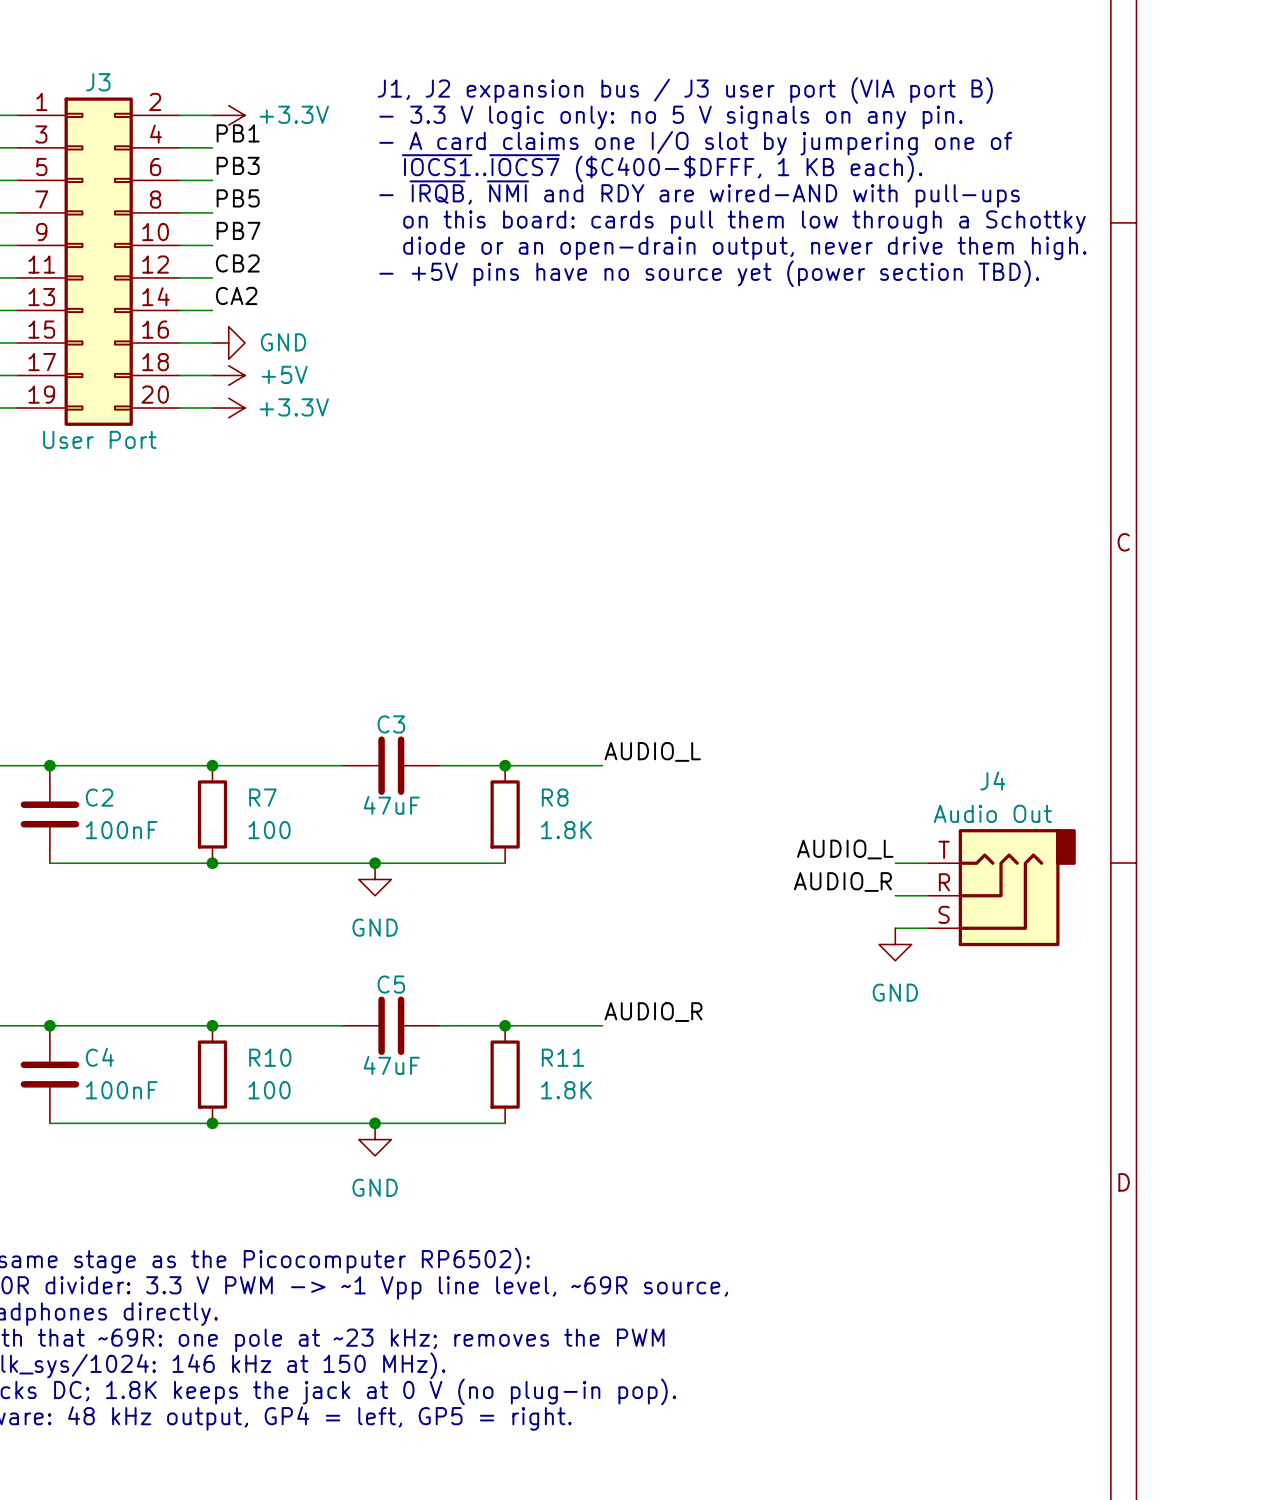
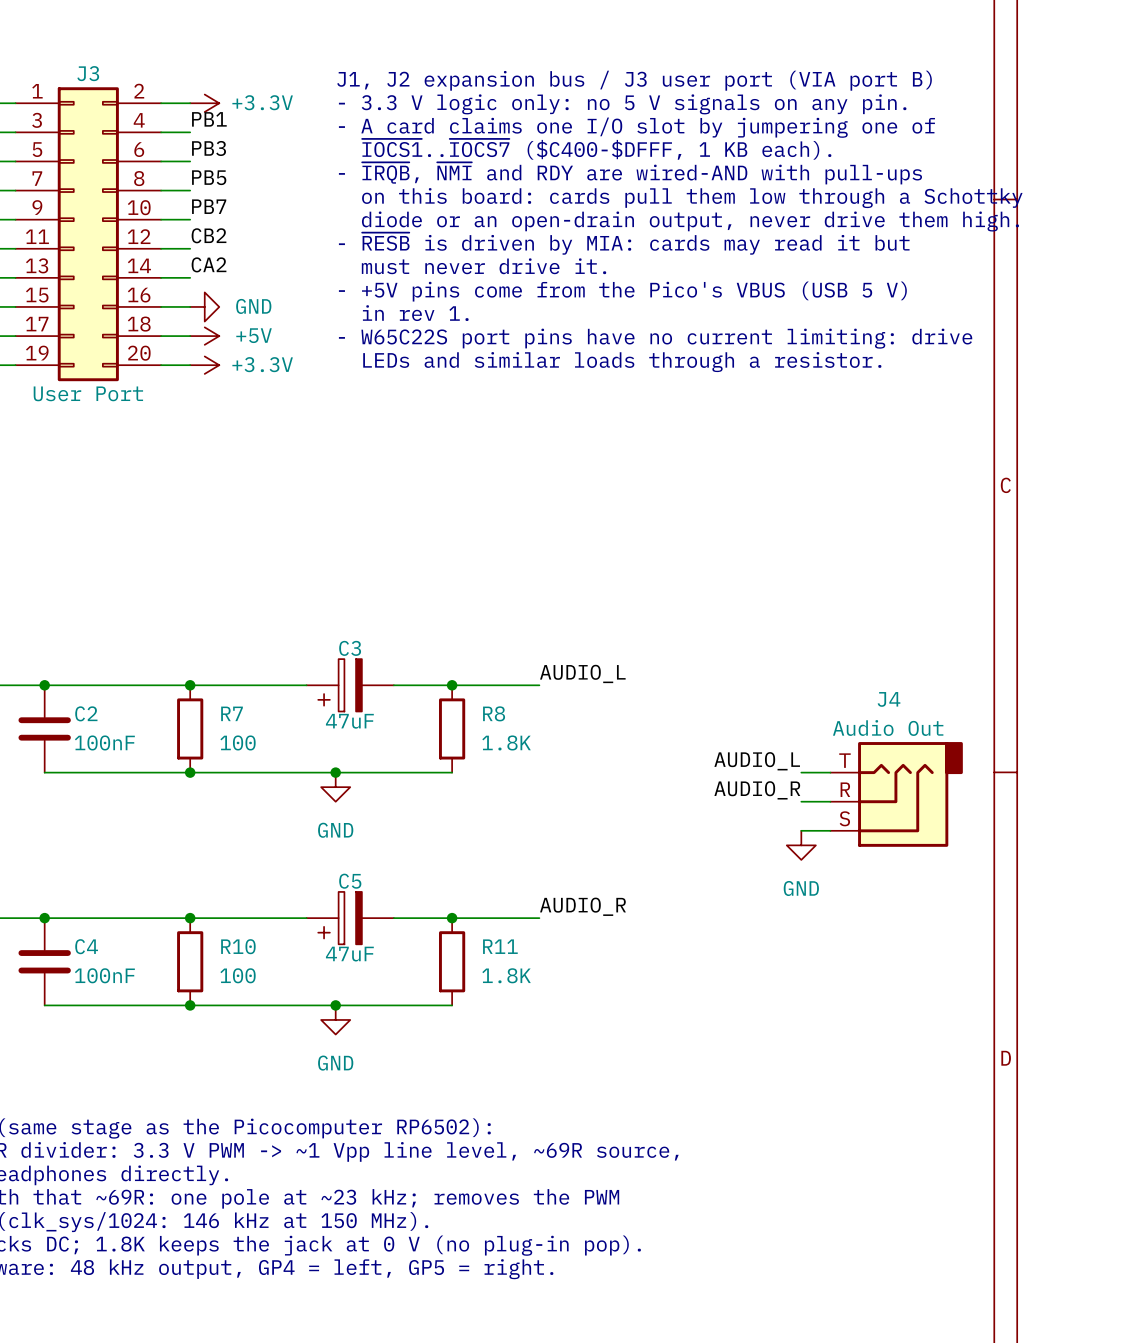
text: - +5V pins have no source yet (power section TBD). (709, 273) -> - ~{RESB} is driven by MIA: cards may read it but (624, 243)
text: none -> must never drive it. (484, 266)
text: none -> - +5V pins come from the Pico's VBUS (USB 5 V) (622, 291)
text: none -> in rev 1. (415, 313)
text: none -> - W65C22S port pins have no current limiting: drive (655, 338)
text: none -> LEDs and similar loads through a resistor. (622, 362)
C3 symbol: [342, 736, 441, 795] -> [306, 659, 394, 712]
C5 symbol: [342, 996, 441, 1056] -> [306, 891, 394, 945]

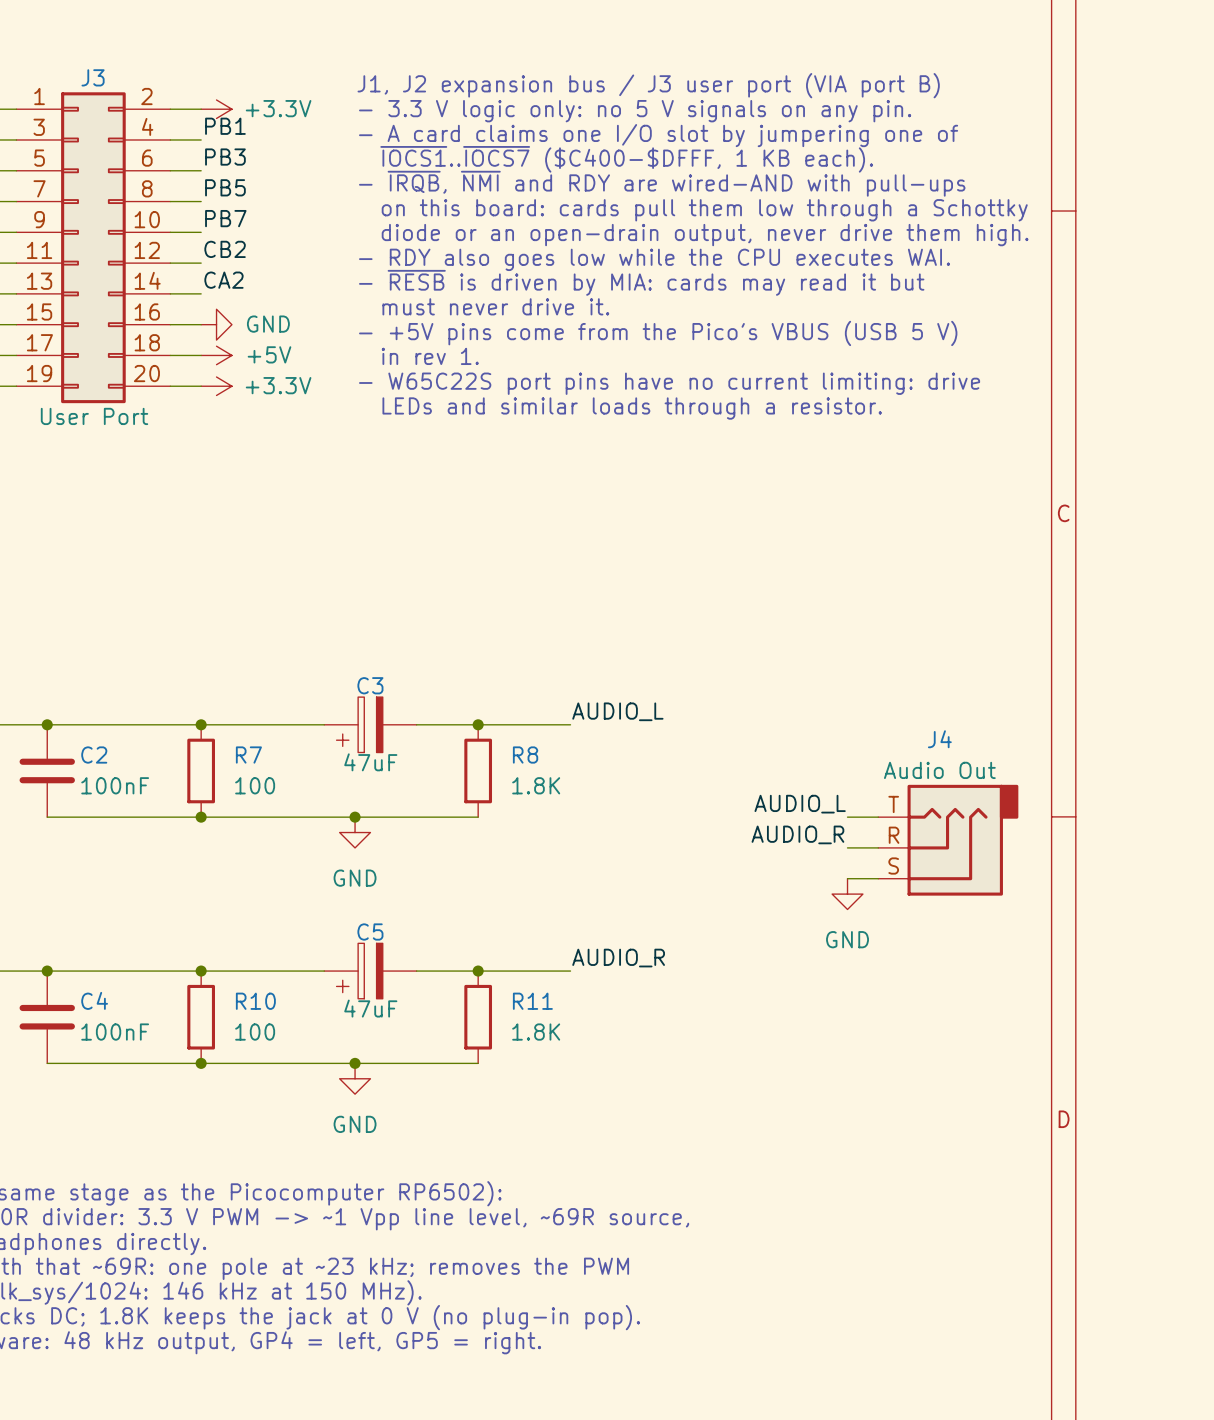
text: - ~{RESB} is driven by MIA: cards may read it but (624, 243) -> - RDY also goes low while the CPU executes WAI. (654, 259)
text: must never drive it. (484, 266) -> - ~{RESB} is driven by MIA: cards may read it but (641, 282)
text: - +5V pins come from the Pico's VBUS (USB 5 V) (622, 291) -> must never drive it. (495, 306)
text: in rev 1. (415, 313) -> - +5V pins come from the Pico's VBUS (USB 5 V) (658, 333)
text: - W65C22S port pins have no current limiting: drive (655, 338) -> in rev 1. (430, 356)
text: LEDs and similar loads through a resistor. (622, 362) -> - W65C22S port pins have no current limiting: drive (669, 383)
text: none -> LEDs and similar loads through a resistor. (632, 408)

